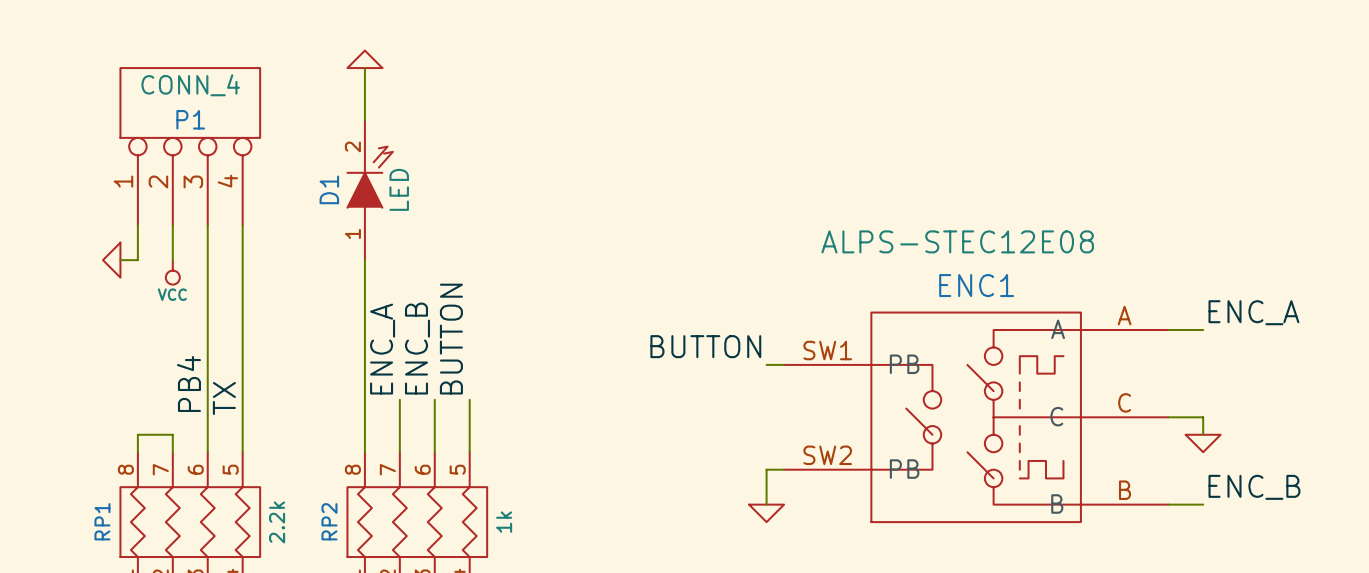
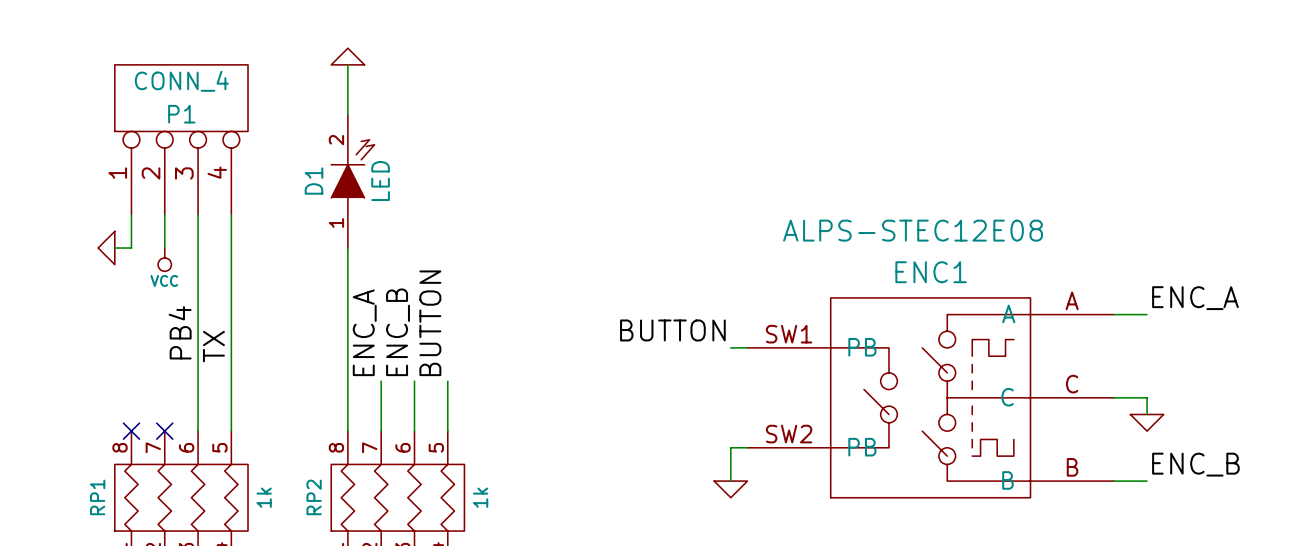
label position: PB4 (188, 384) -> PB4 (180, 332)
label position: TX (224, 398) -> TX (213, 346)
wire: (137, 452) (137, 434) (172, 434) (172, 452) -> none
no-connect mark: none -> (131, 431)
no-connect mark: none -> (164, 431)
RP1 value: 2.2k (277, 522) -> 1k (264, 497)

